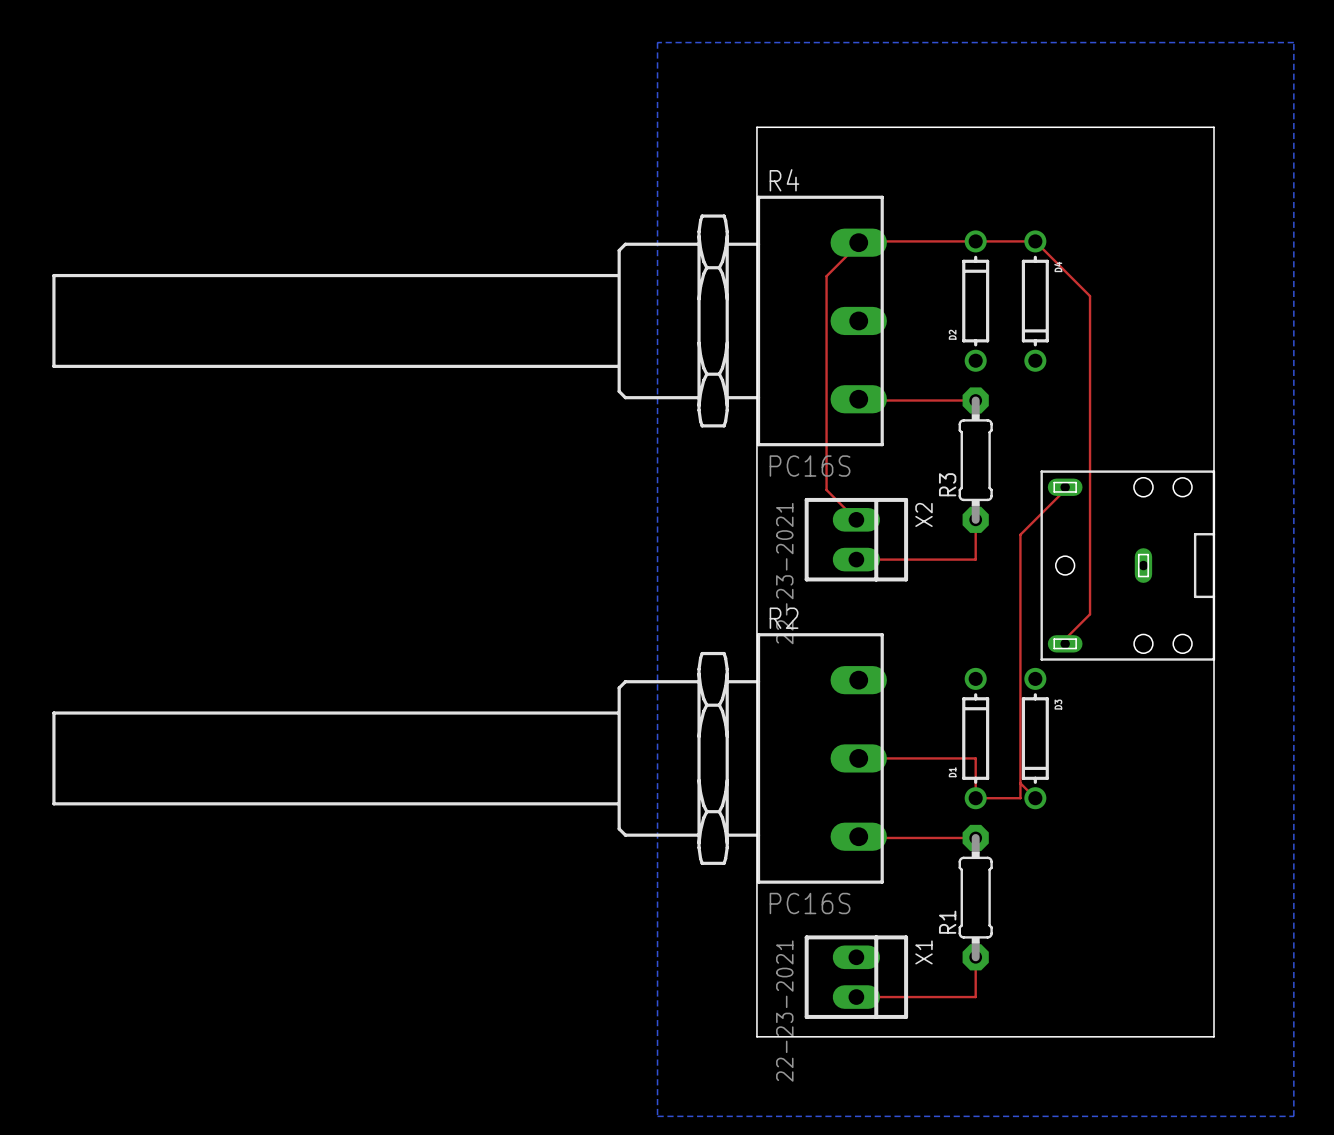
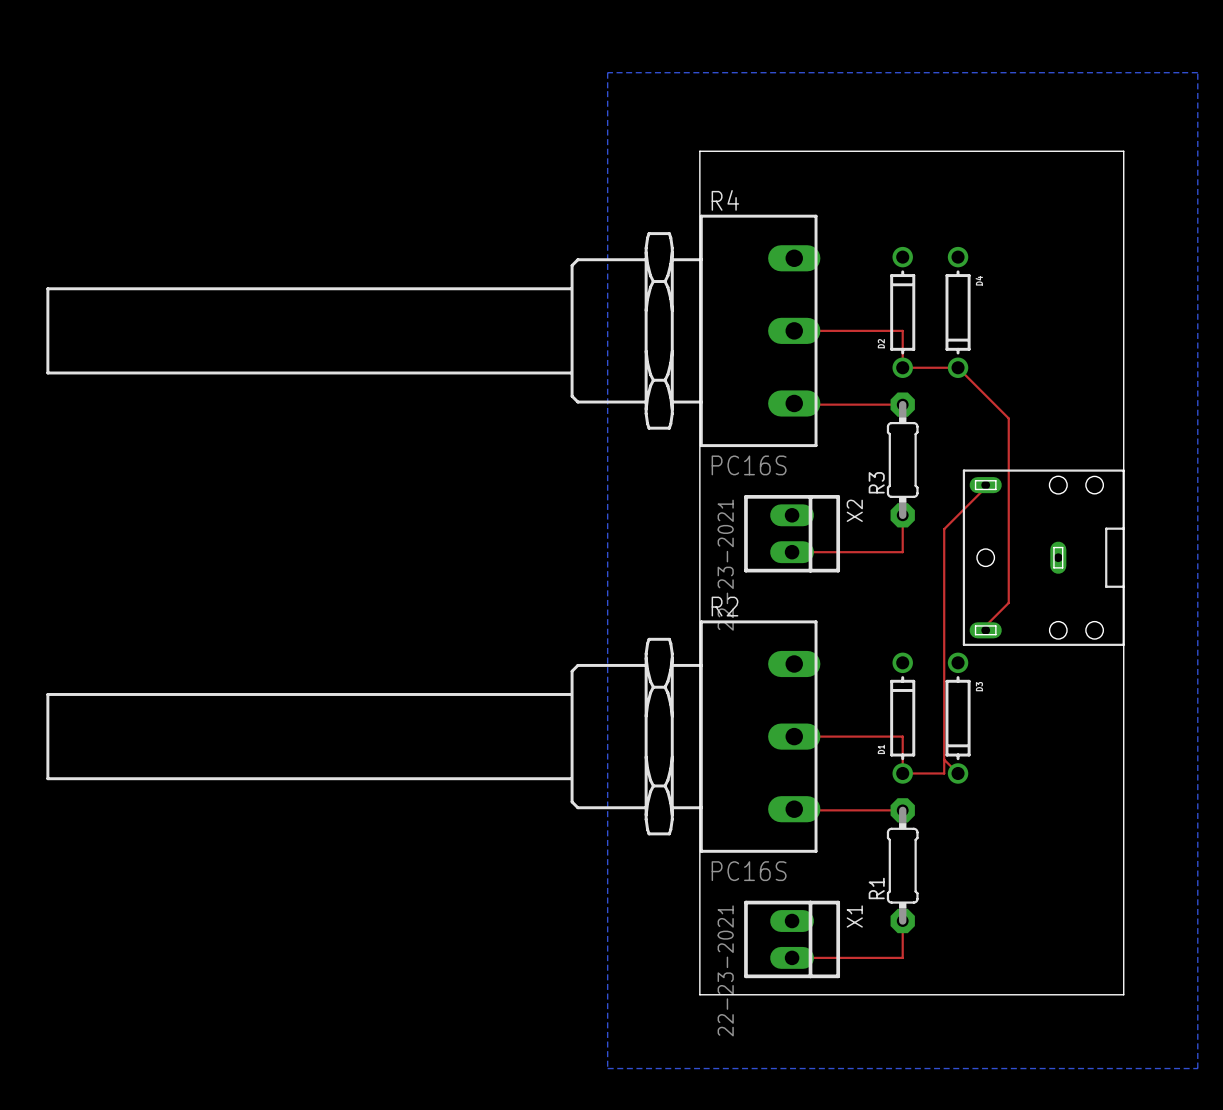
top track: (1090, 415) (1090, 296) (1035, 241) (861, 241) (826, 276) (826, 489) (856, 519) -> (1008, 418) (958, 367) (902, 367) (902, 330) (794, 330)

